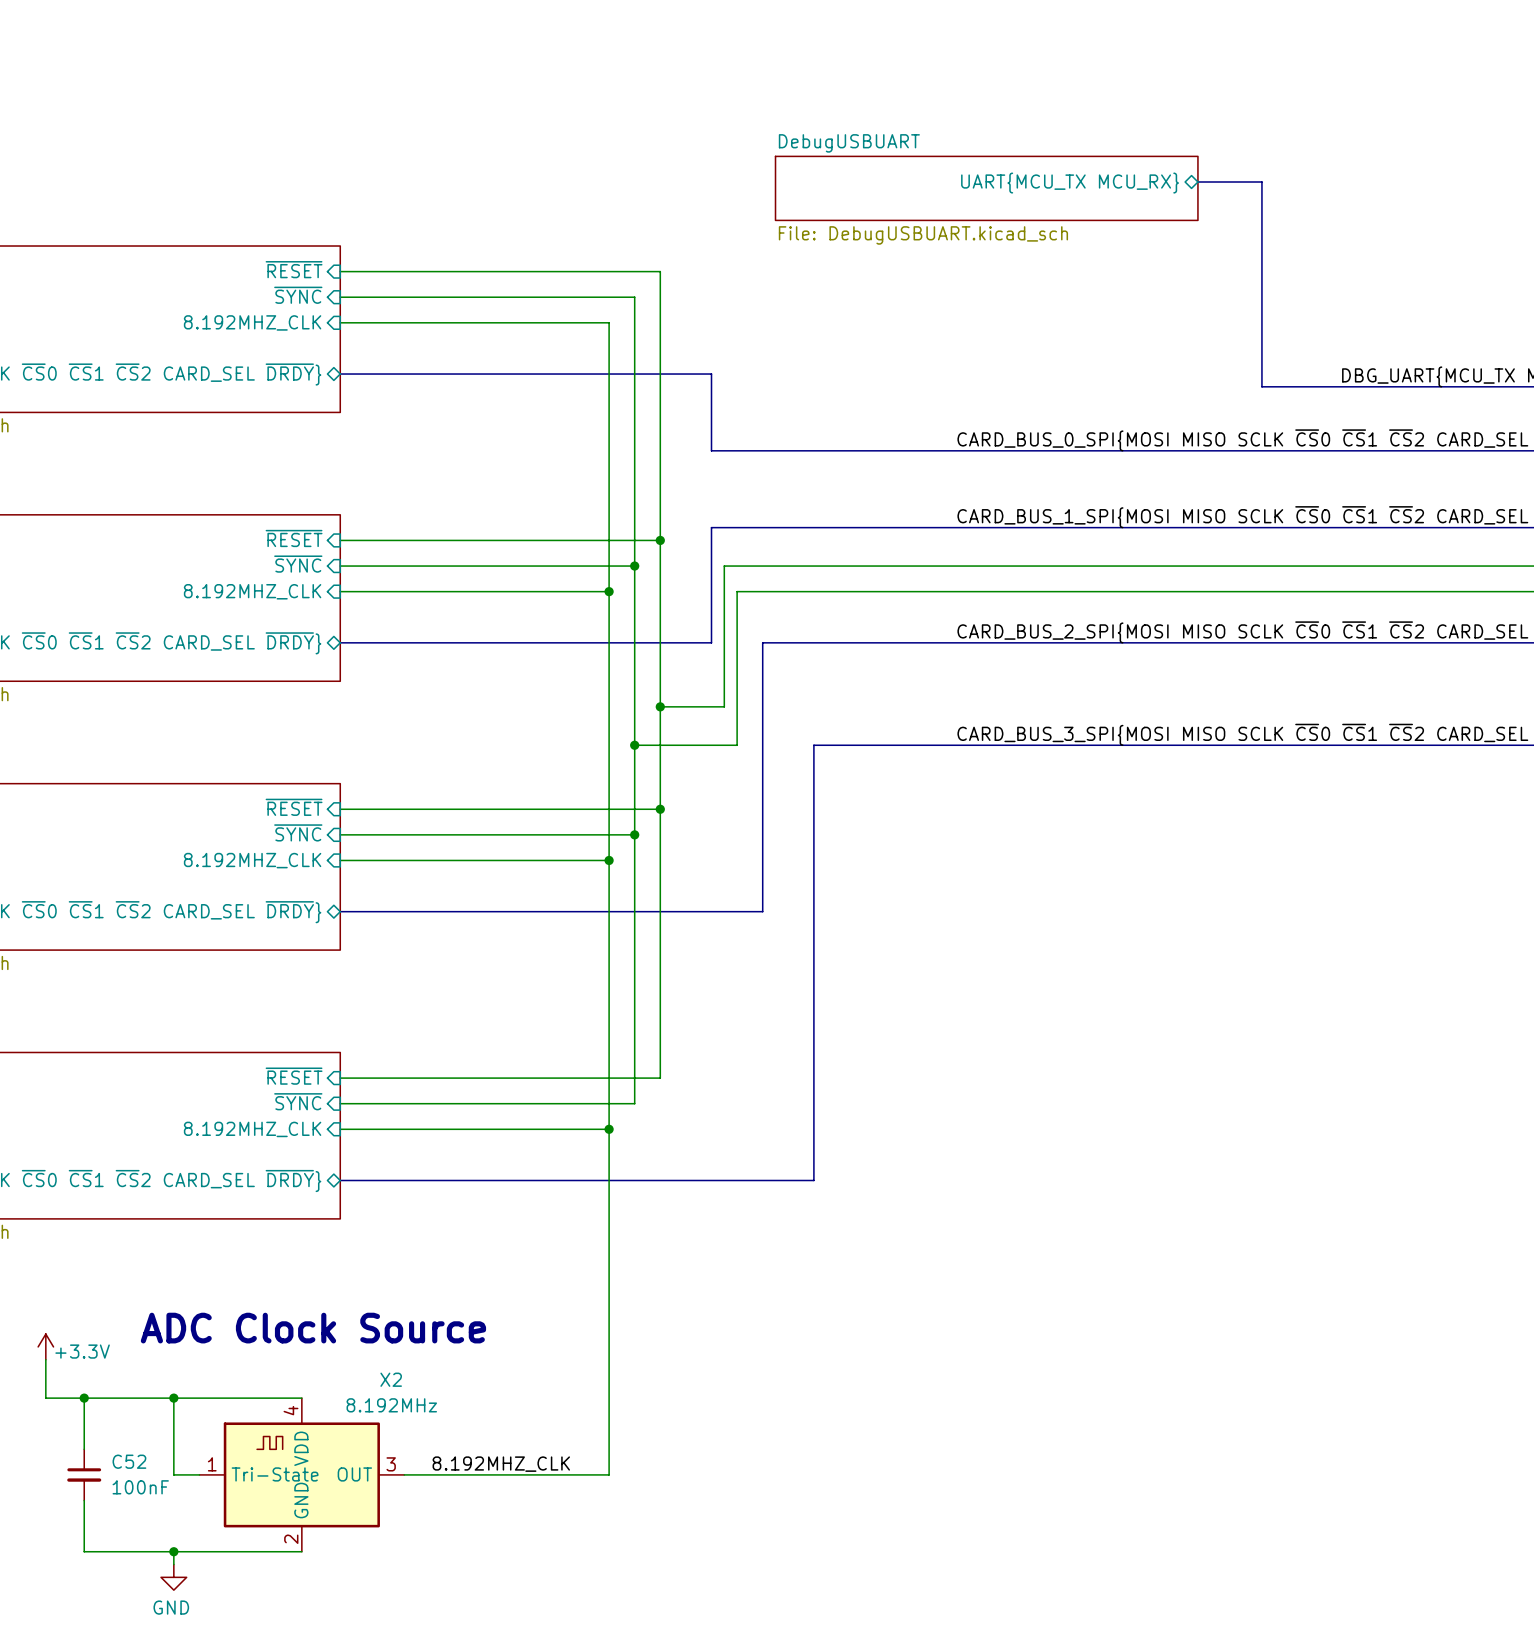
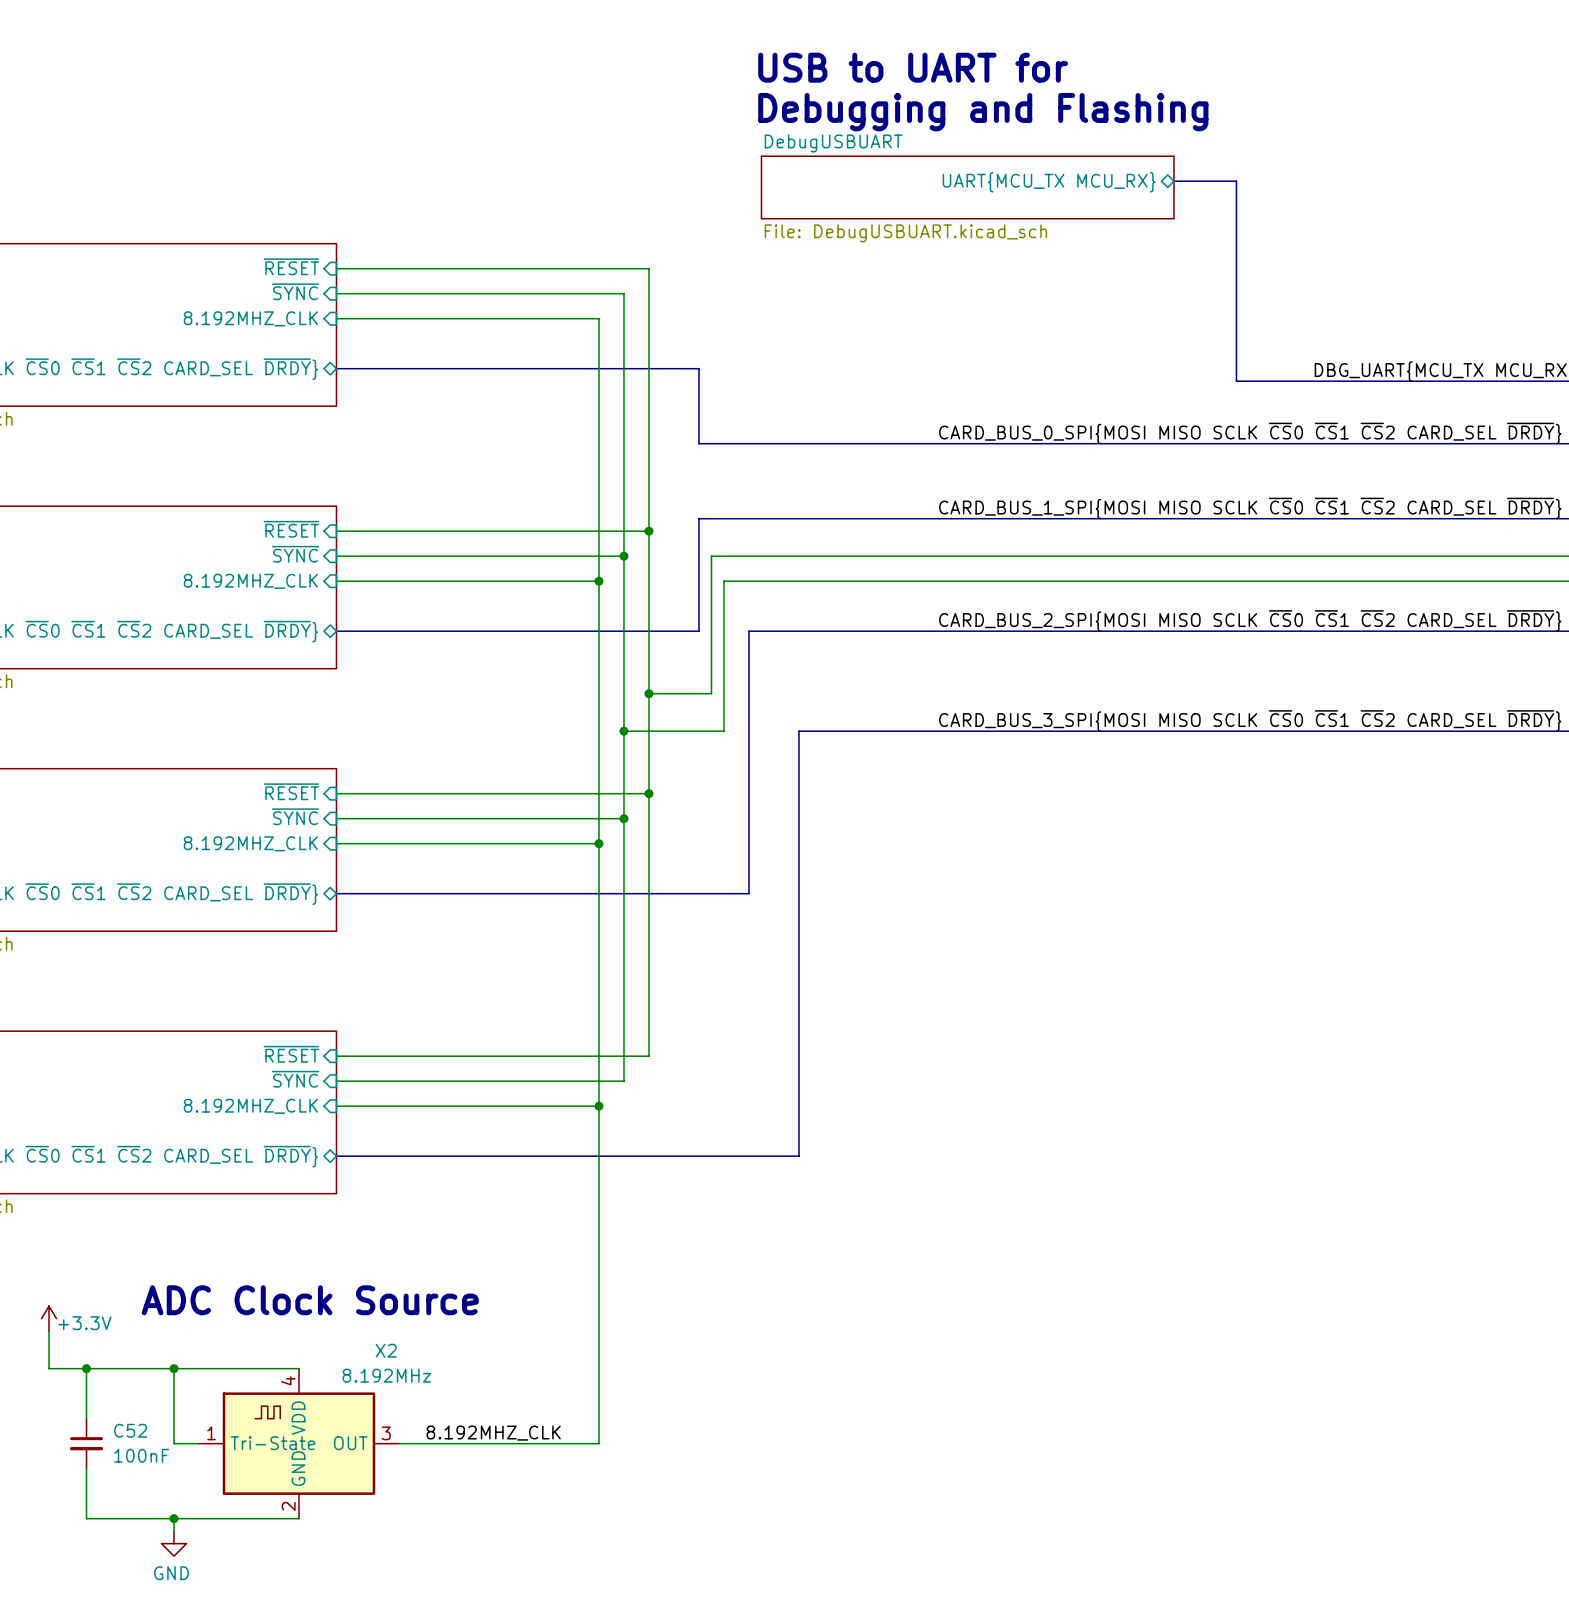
text: none -> USB to UART for (913, 67)
text: none -> Debugging and Flashing (983, 112)

